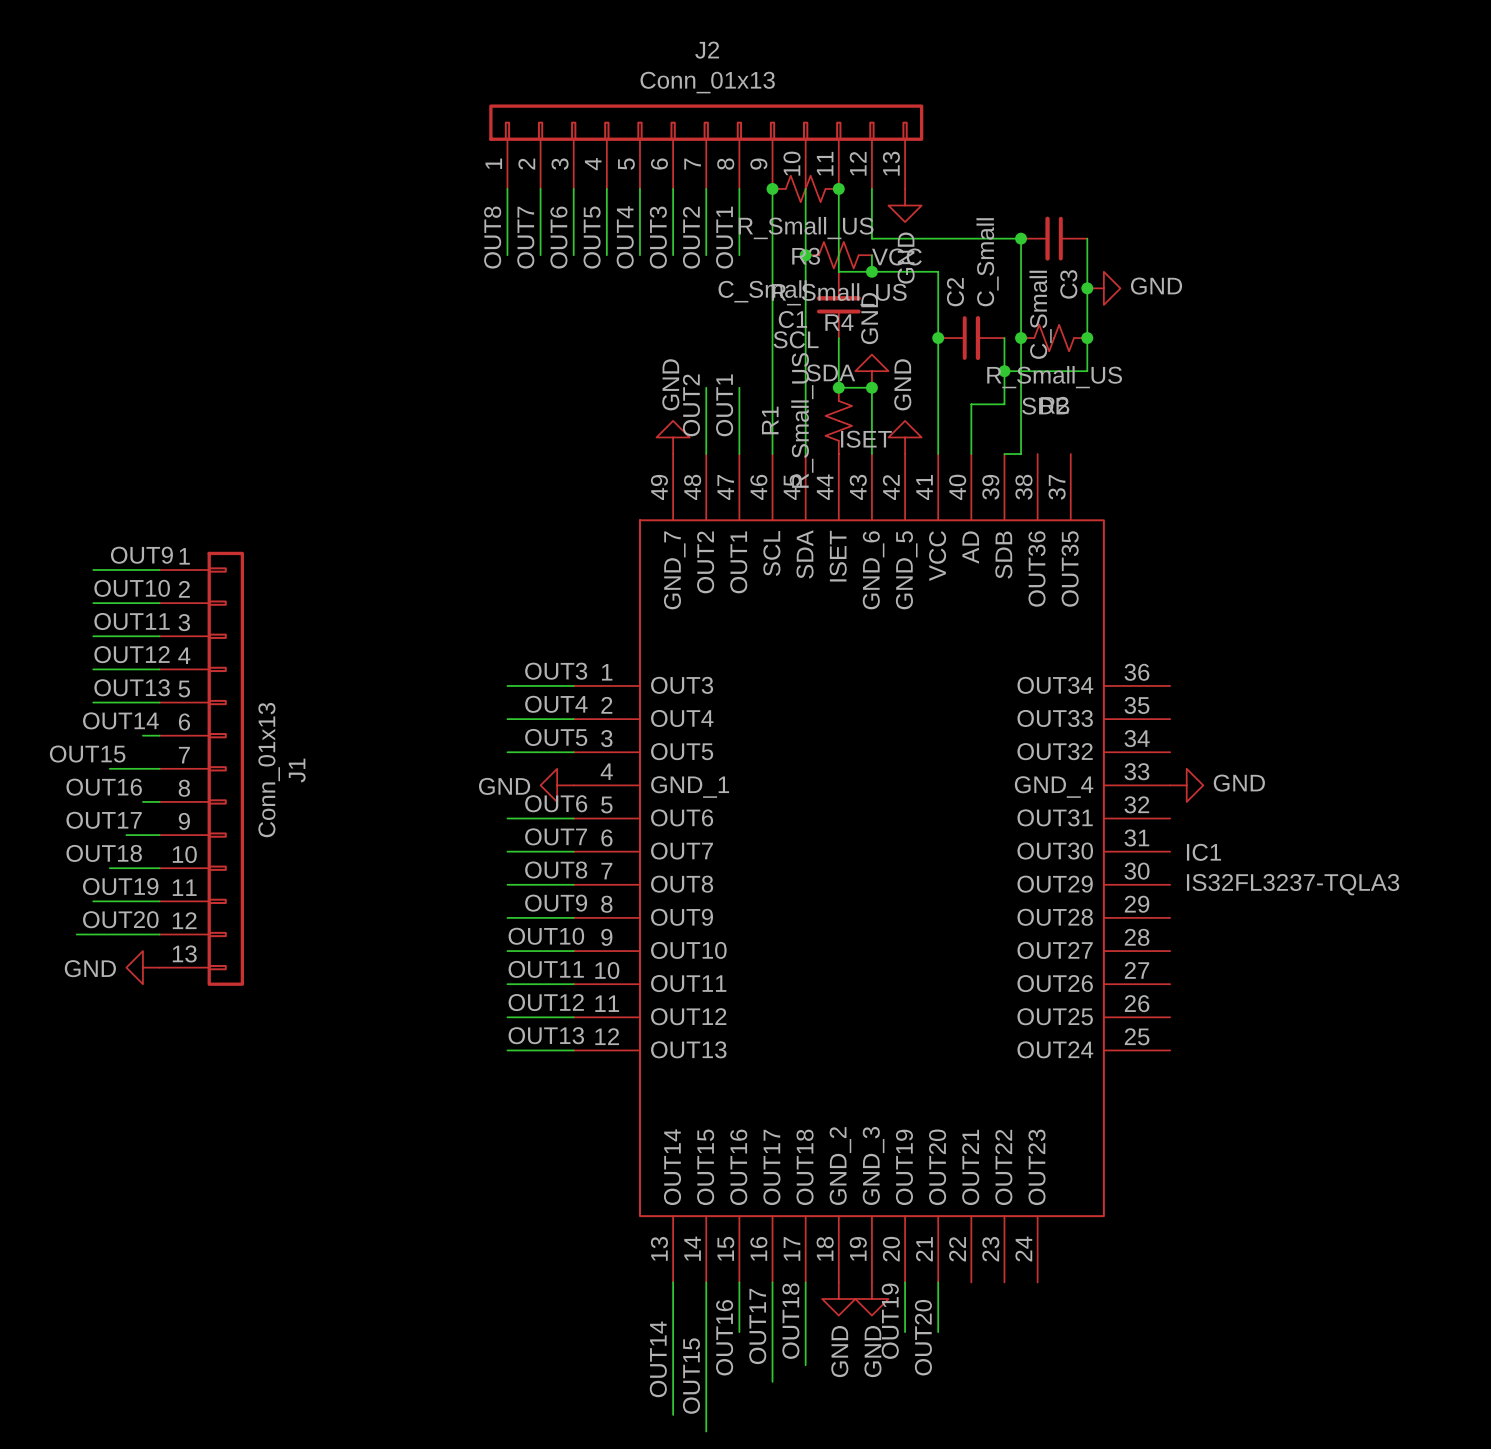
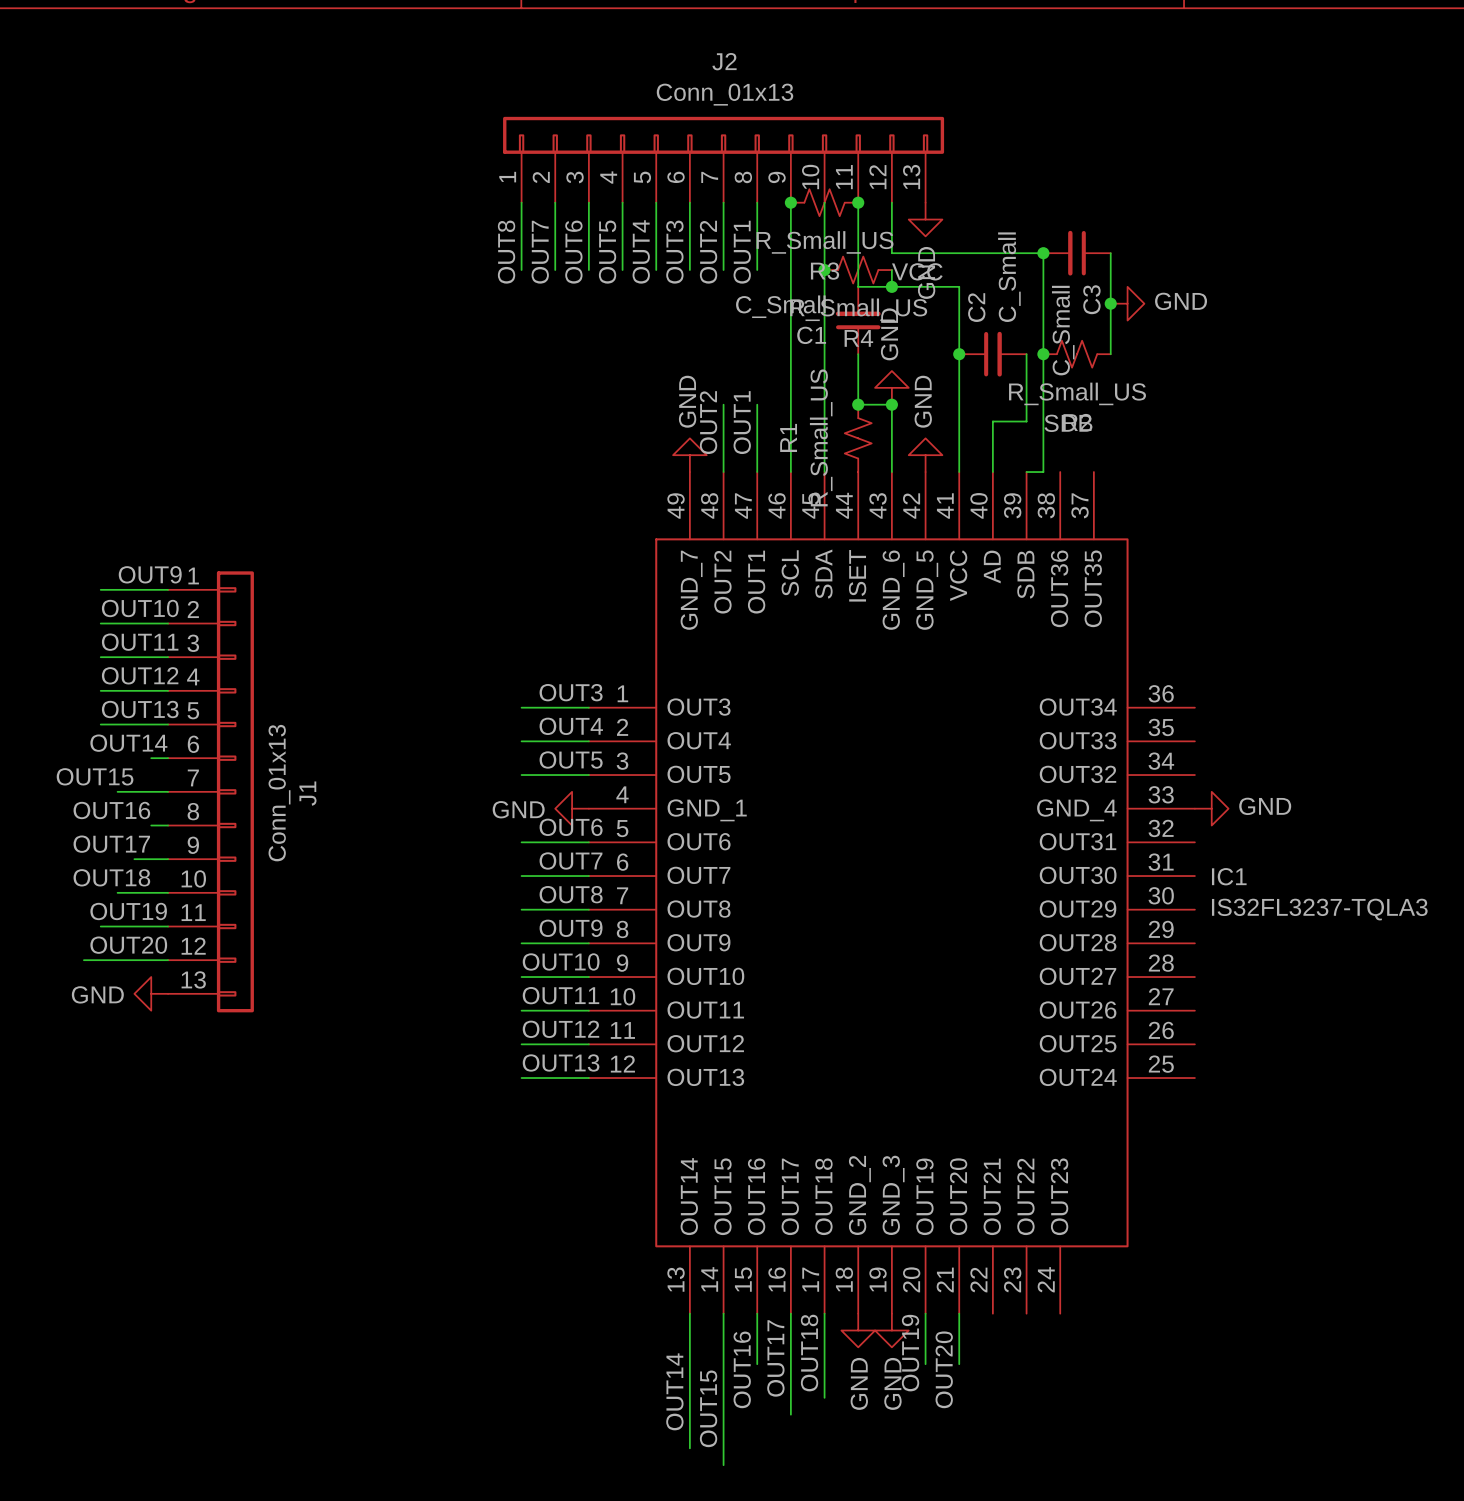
wire: (1087, 338) (1087, 371) (1004, 371) -> none
junction: (1087, 338) -> none
label: SCL (796, 339) -> none
junction: (1004, 371) -> none
label: SDA (830, 372) -> none
label: ISET (866, 439) -> none

